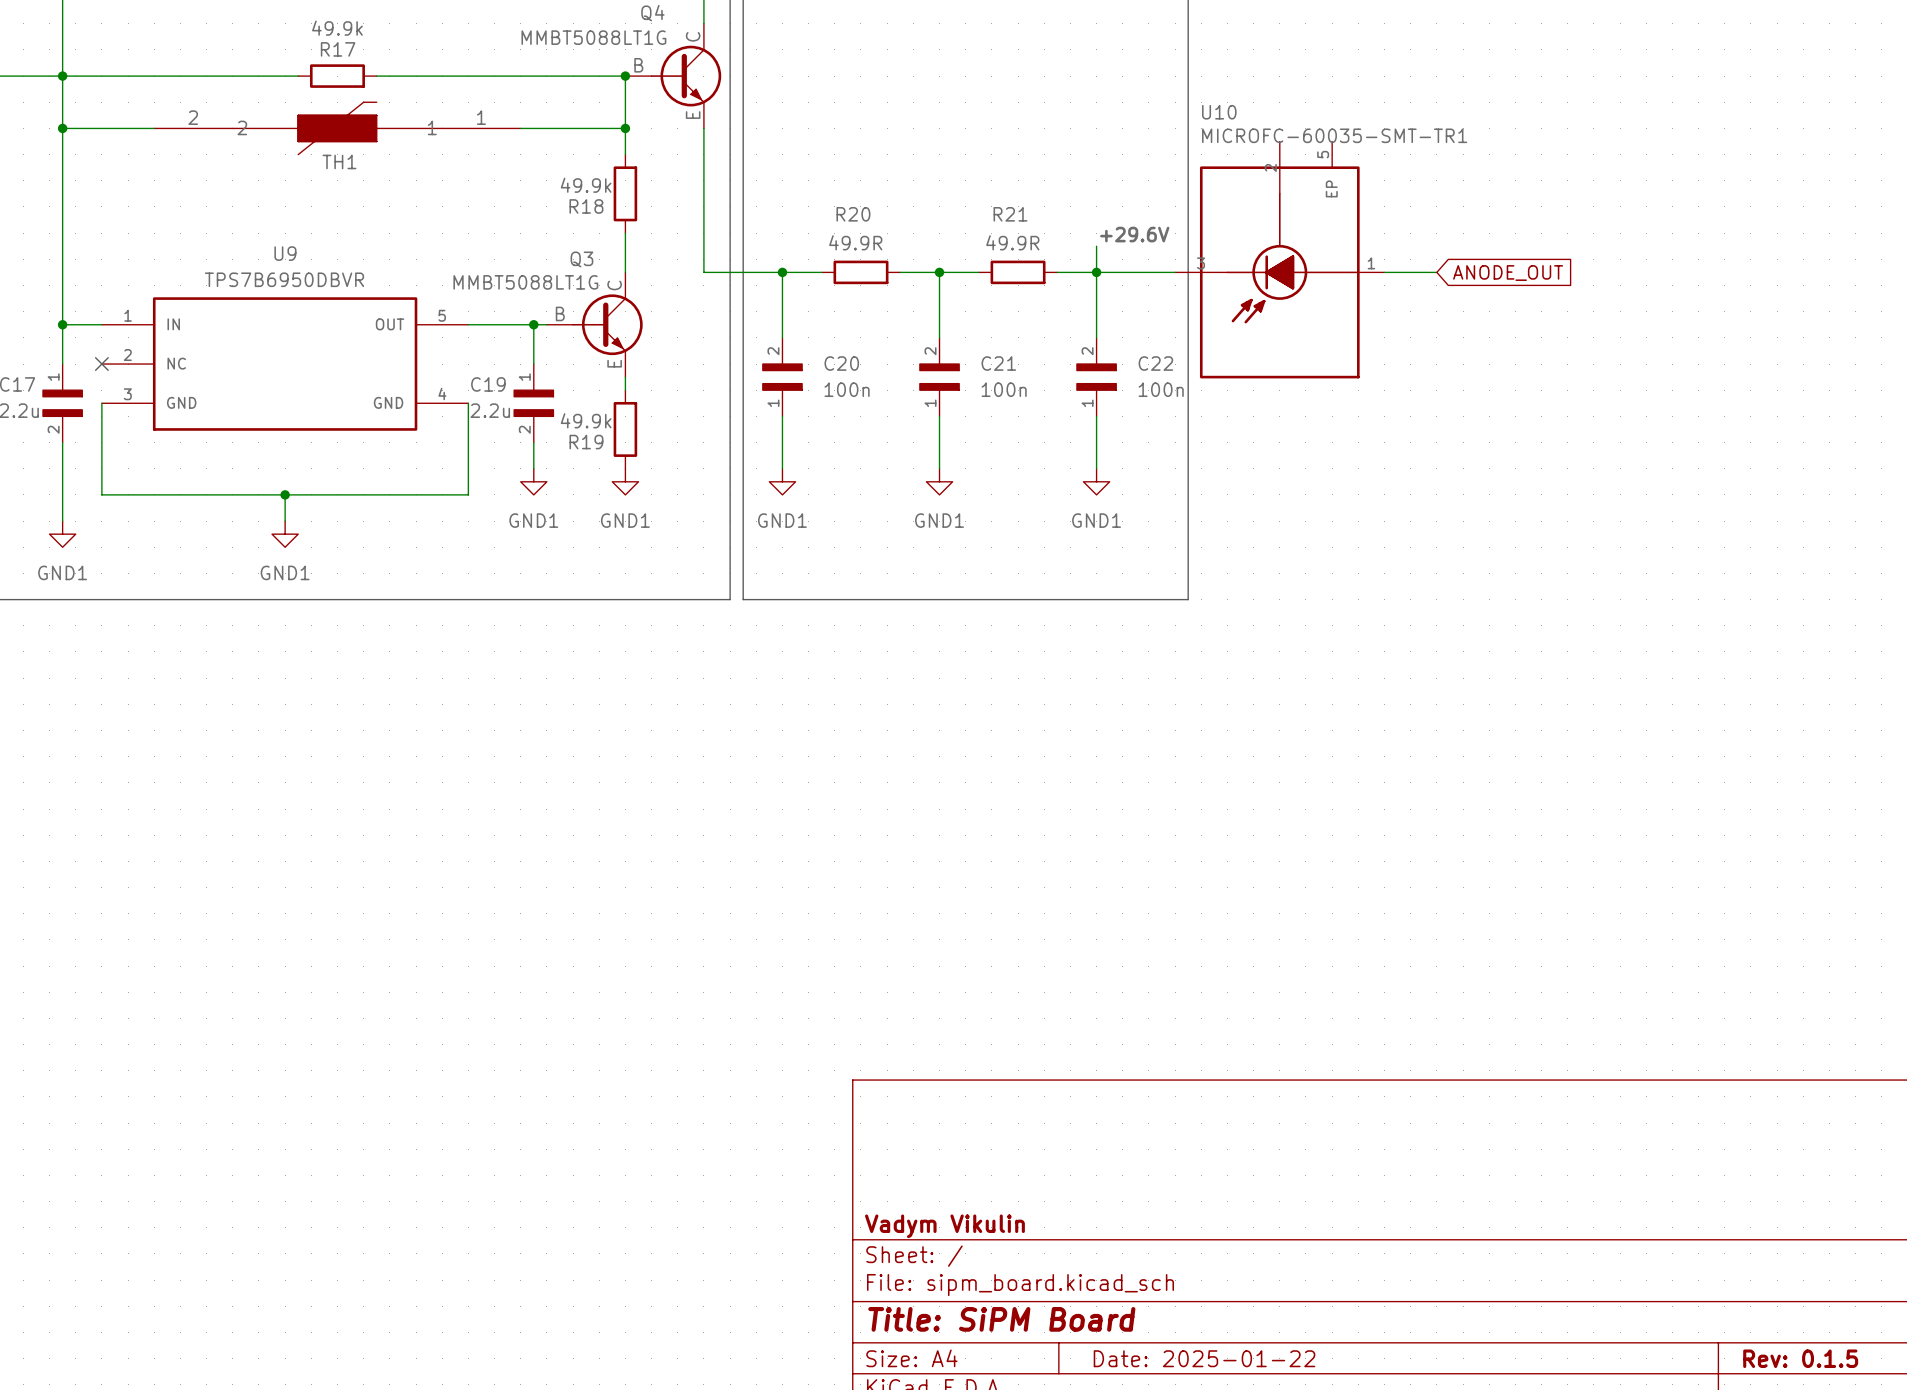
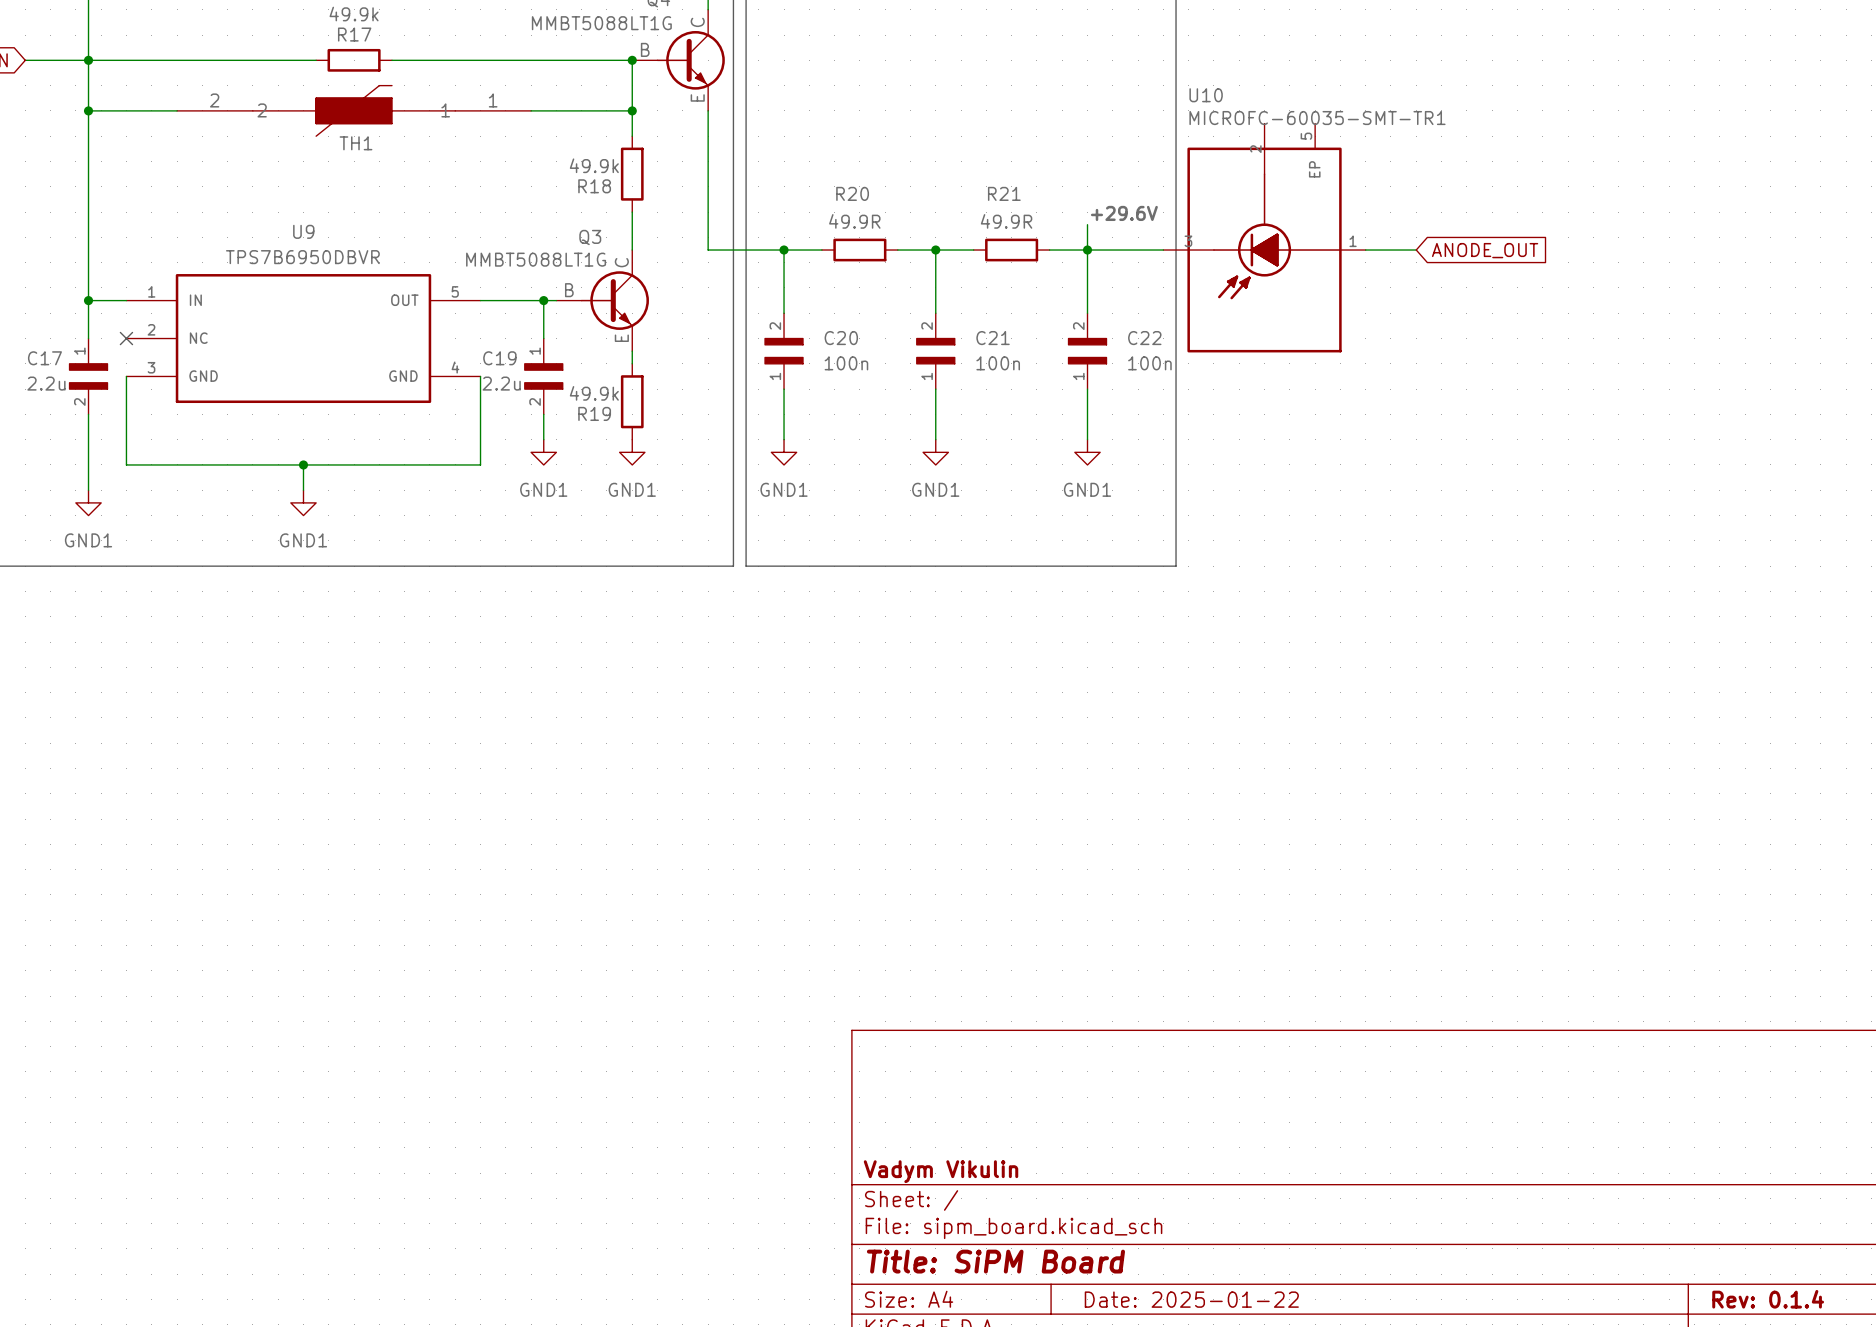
title block: Rev: 0.1.5 (1800, 1358) -> Rev: 0.1.4 (1768, 1299)

